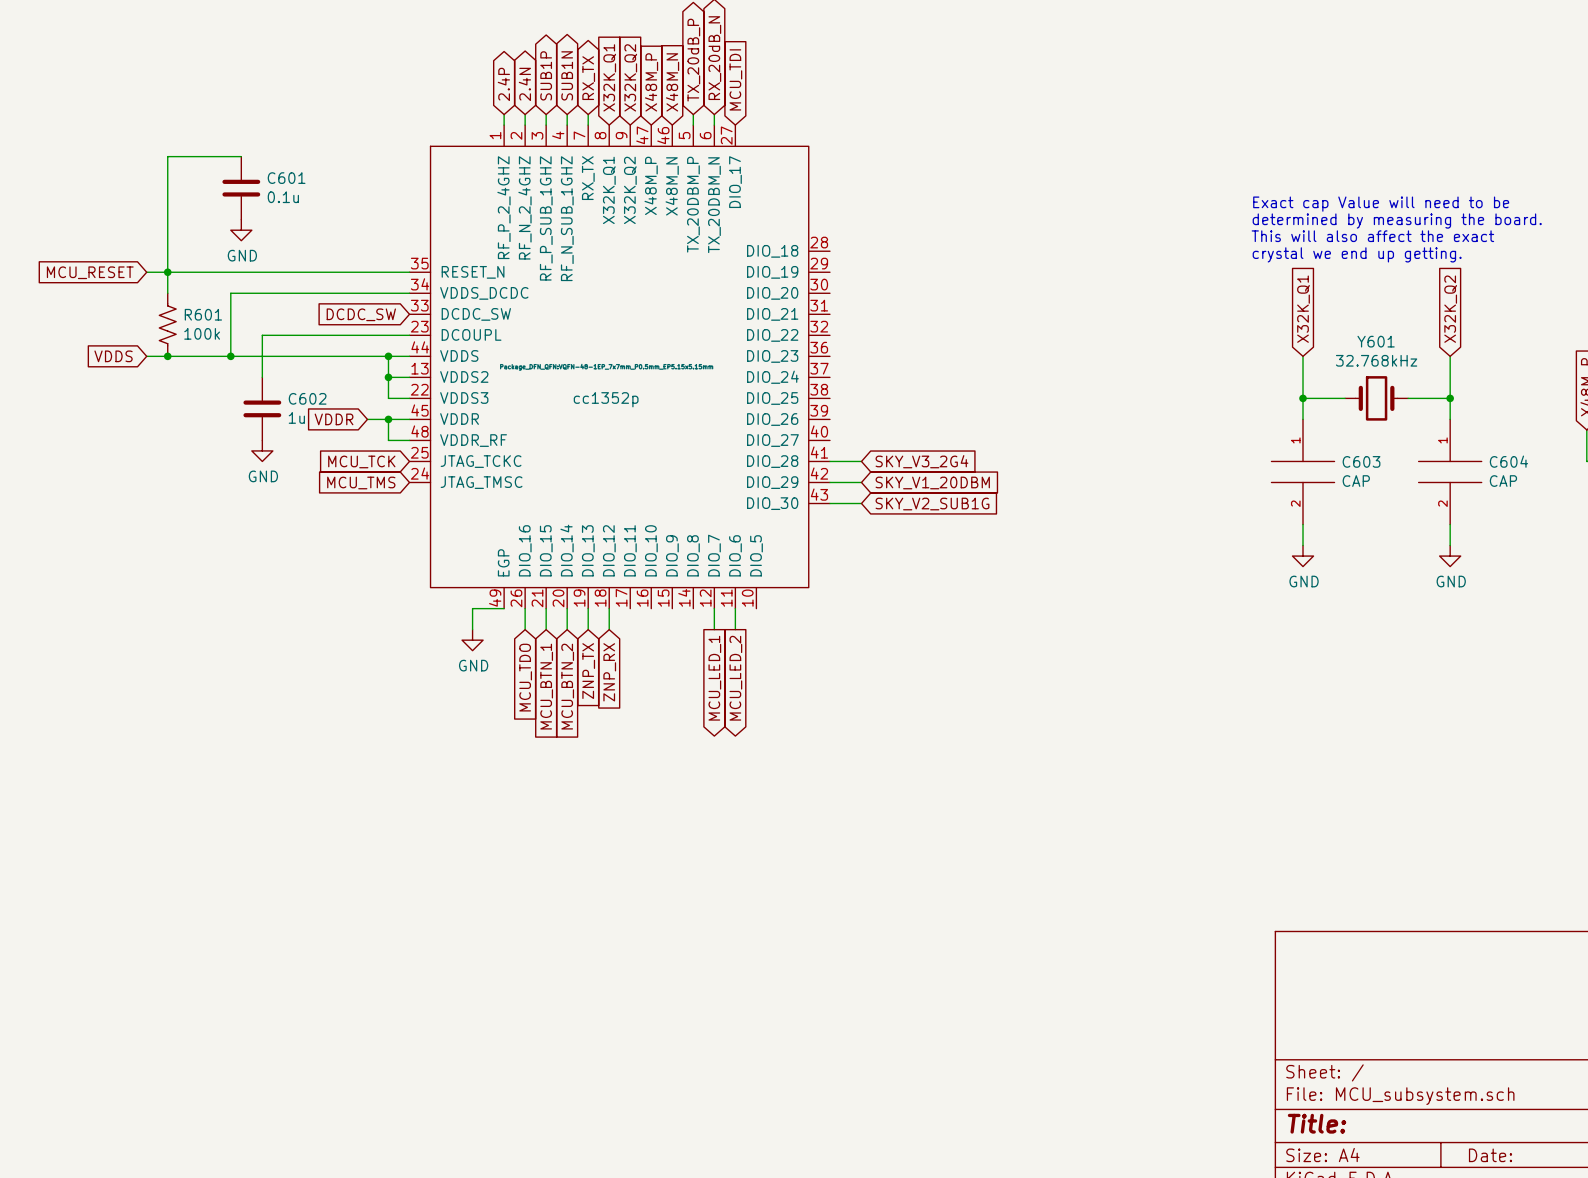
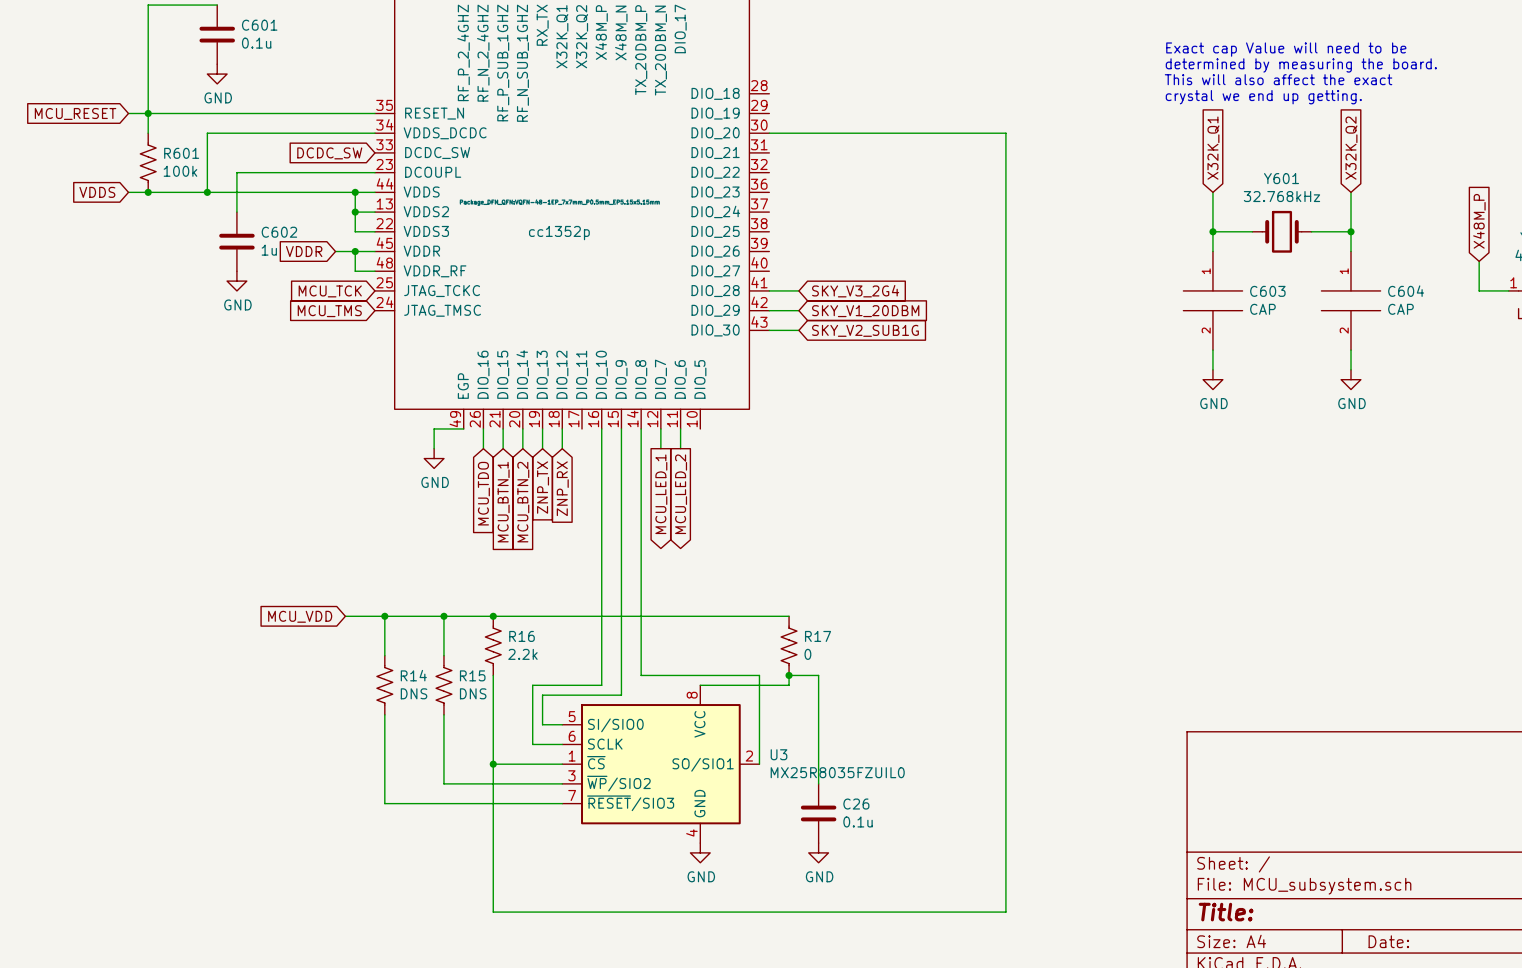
wire: none -> (769, 133) (1005, 133) (1005, 912) (493, 912) (493, 675)
wire: none -> (601, 428) (601, 685) (532, 685) (532, 744) (562, 744)
wire: none -> (621, 428) (621, 695) (542, 695) (542, 724) (562, 724)
wire: none -> (641, 428) (641, 675) (759, 675) (759, 764)
global label: none -> MCU_VDD (300, 616)
wire: none -> (345, 616) (789, 616)
wire: none -> (384, 616) (384, 655)
junction: none -> (384, 616)
wire: none -> (443, 616) (443, 655)
junction: none -> (443, 616)
junction: none -> (493, 616)
R16: none -> 2.2k (493, 645)
R17: none -> 0 (789, 645)
junction: none -> (789, 675)
R14: none -> DNS (384, 685)
R15: none -> DNS (443, 685)
wire: none -> (700, 685) (789, 685) (789, 675) (818, 675) (818, 783)
wire: none -> (384, 714) (384, 803) (562, 803)
wire: none -> (443, 714) (443, 783) (562, 783)
wire: none -> (493, 764) (562, 764)
junction: none -> (493, 764)
U3: none -> MX25R8035FZUIL0 (660, 764)
C26: none -> 0.1u (818, 813)
power symbol: none -> GND (700, 852)
power symbol: none -> GND (818, 852)

